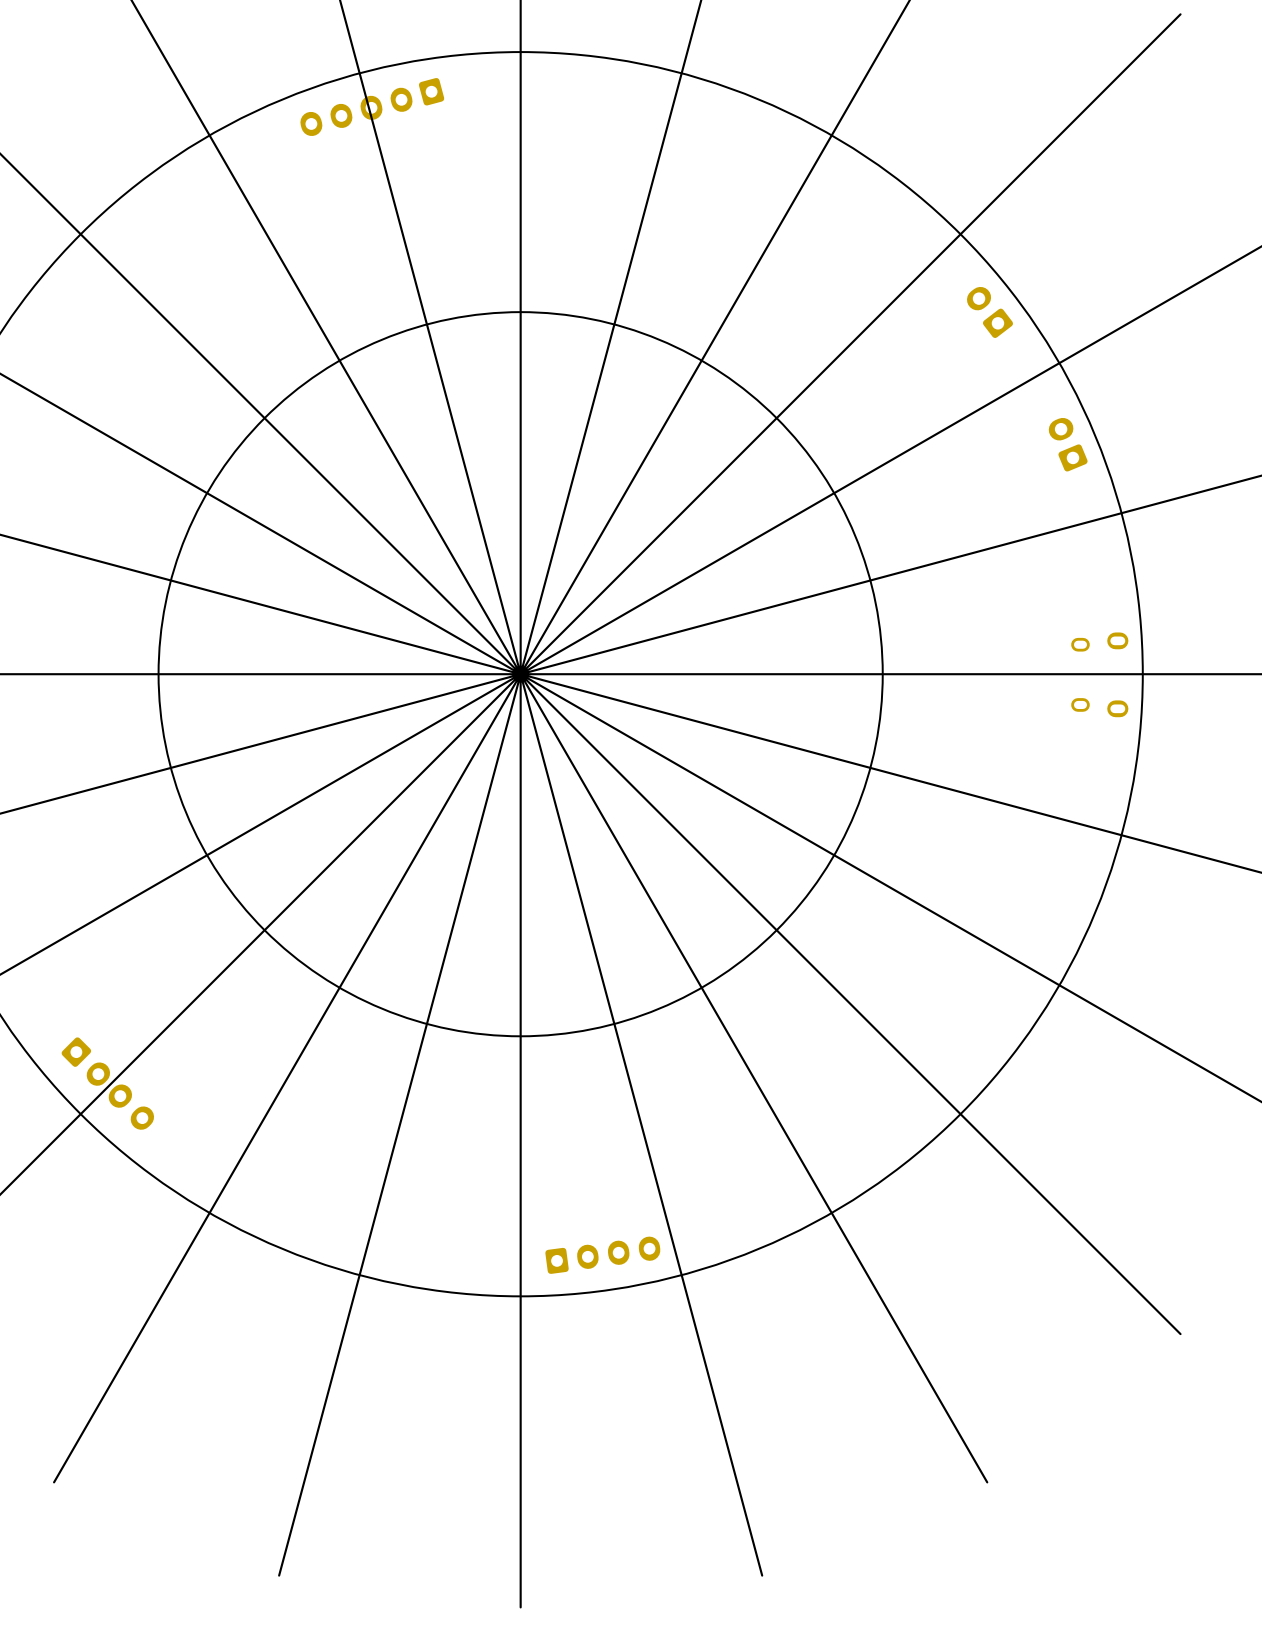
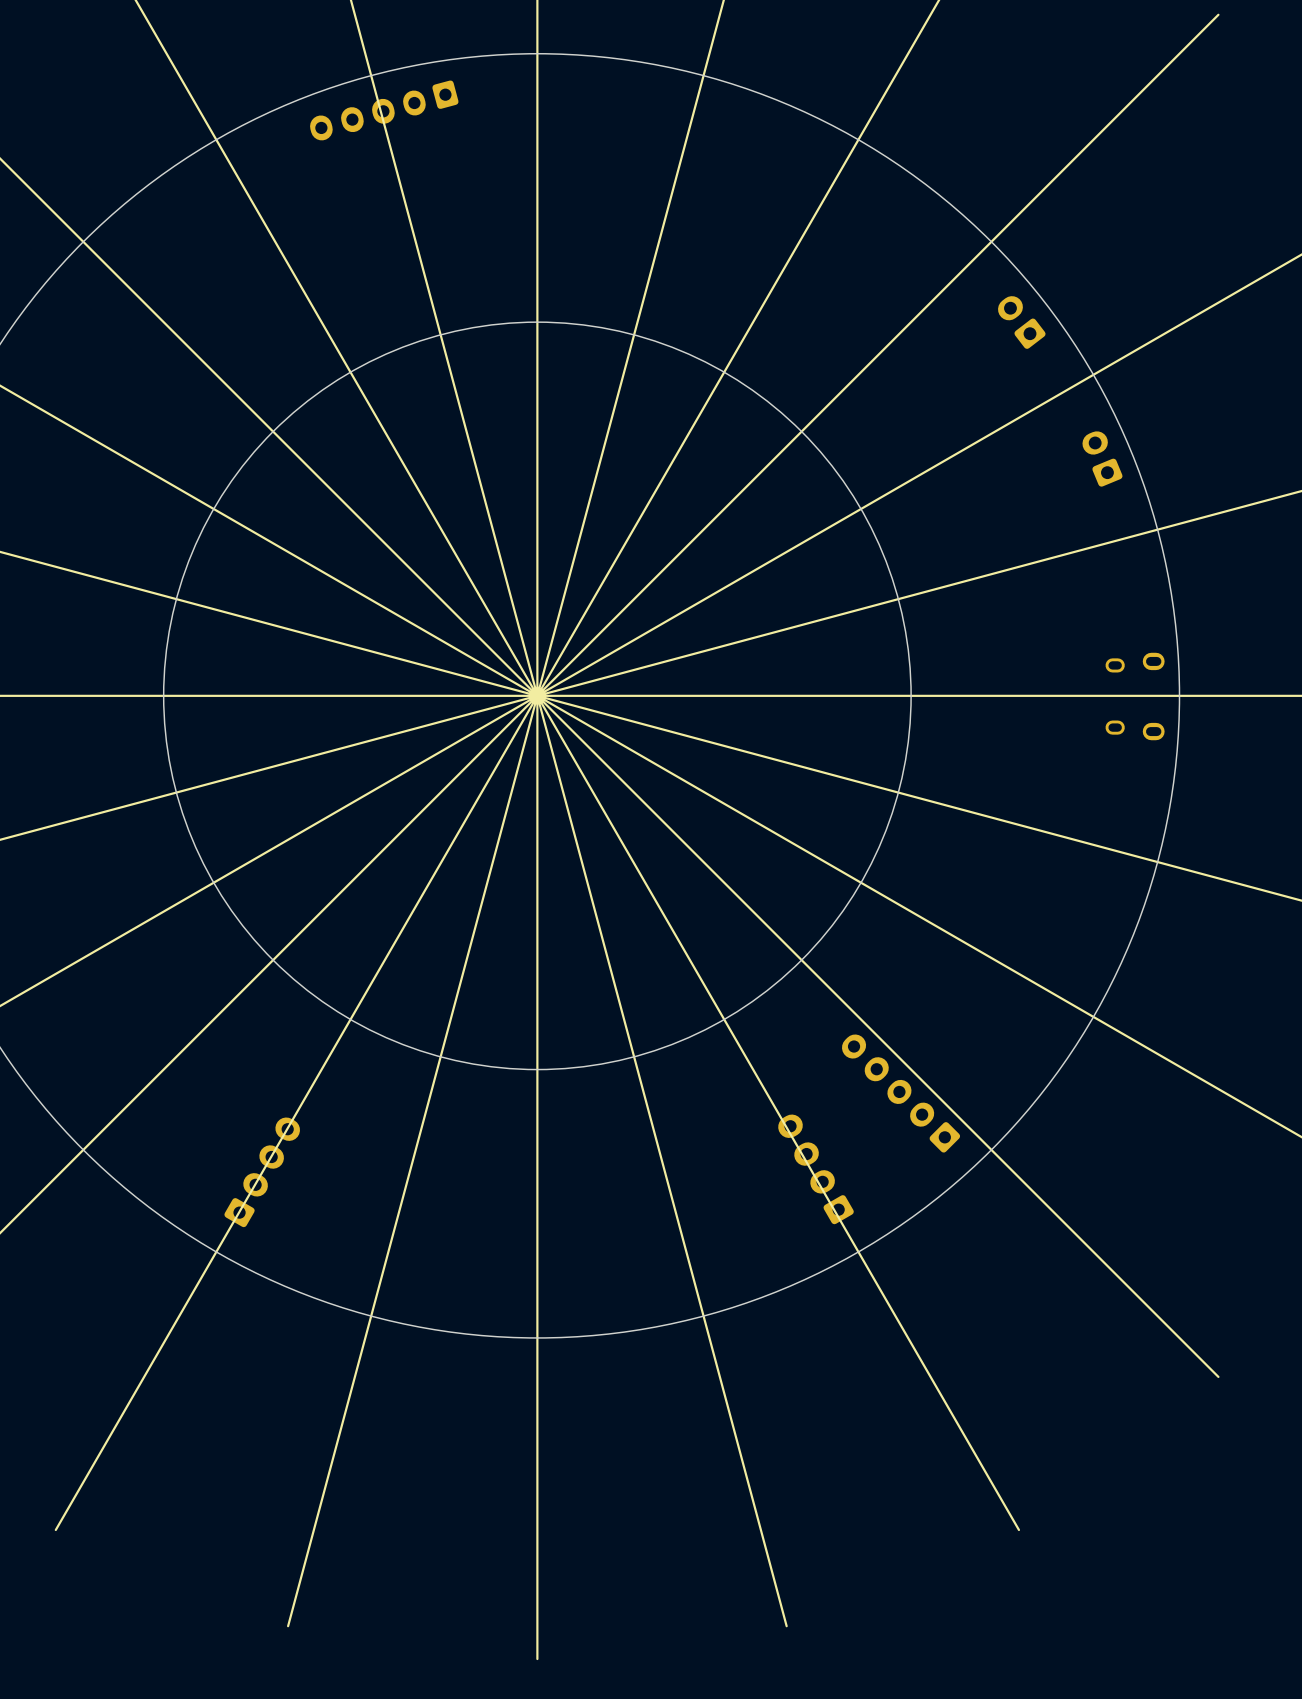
part: none -> (901, 1093)
part: (107, 1083) -> none
part: none -> (815, 1169)
part: none -> (262, 1172)
part: (602, 1255) -> none

